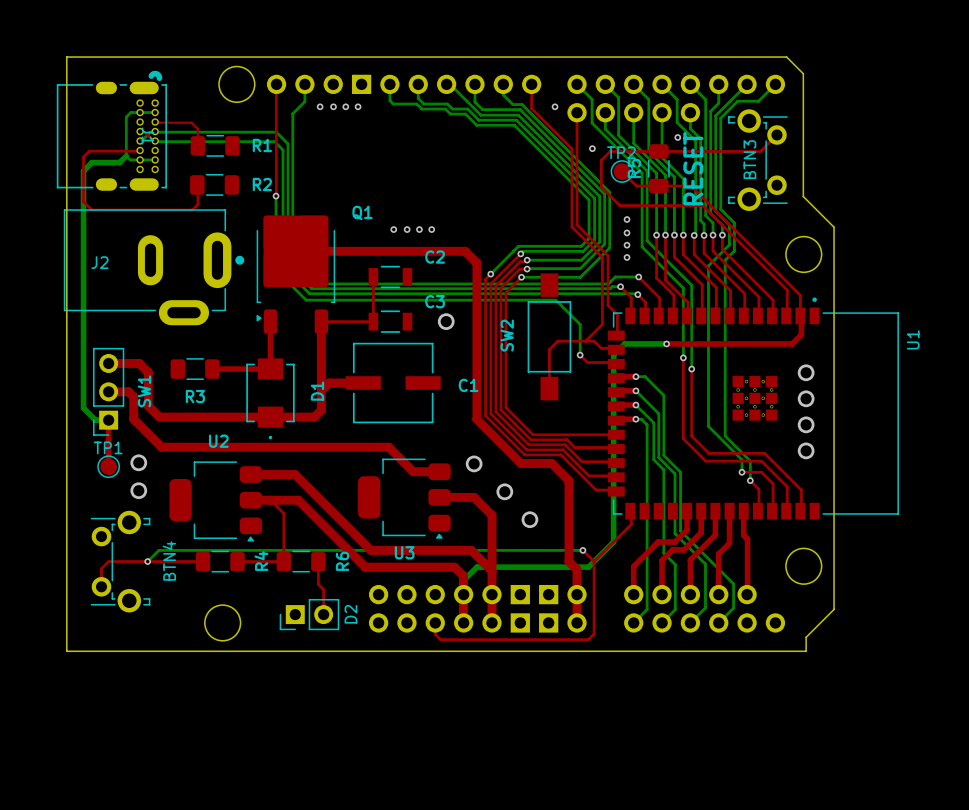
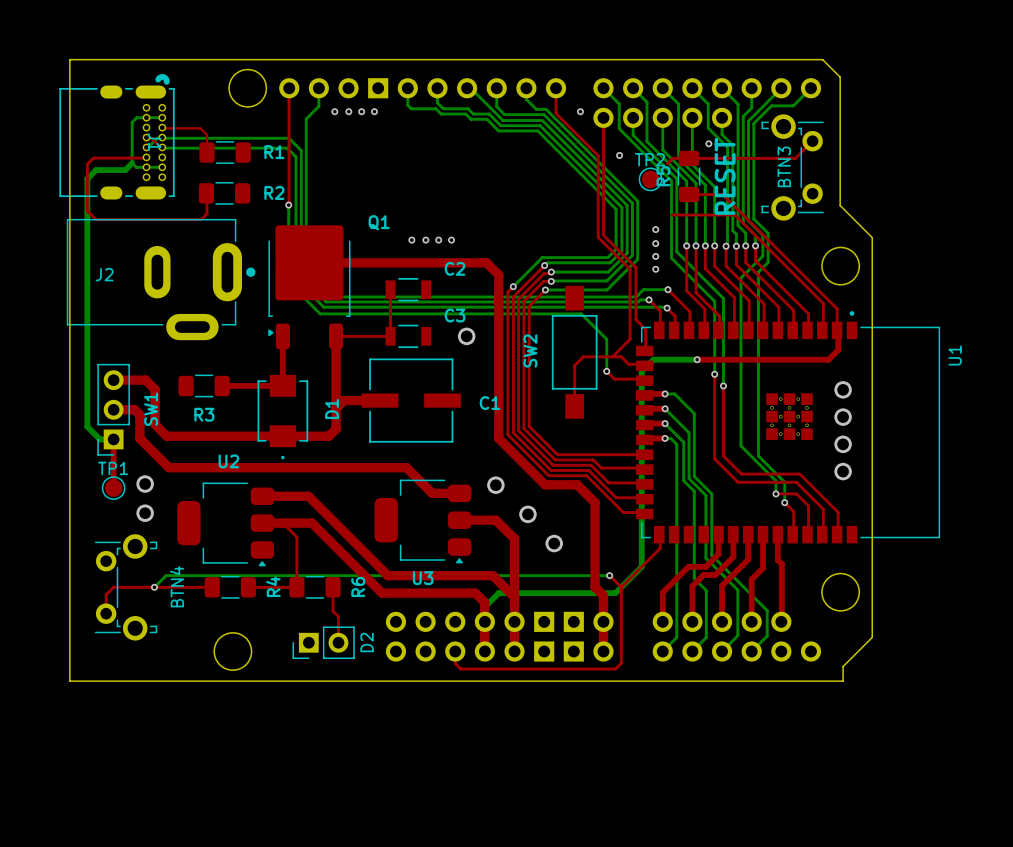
top track: (643, 151) (610, 151) (601, 160) (601, 187) (619, 205) (642, 205) -> (672, 158) (667, 163)
top track: (621, 171) (636, 186) (658, 186) -> none

